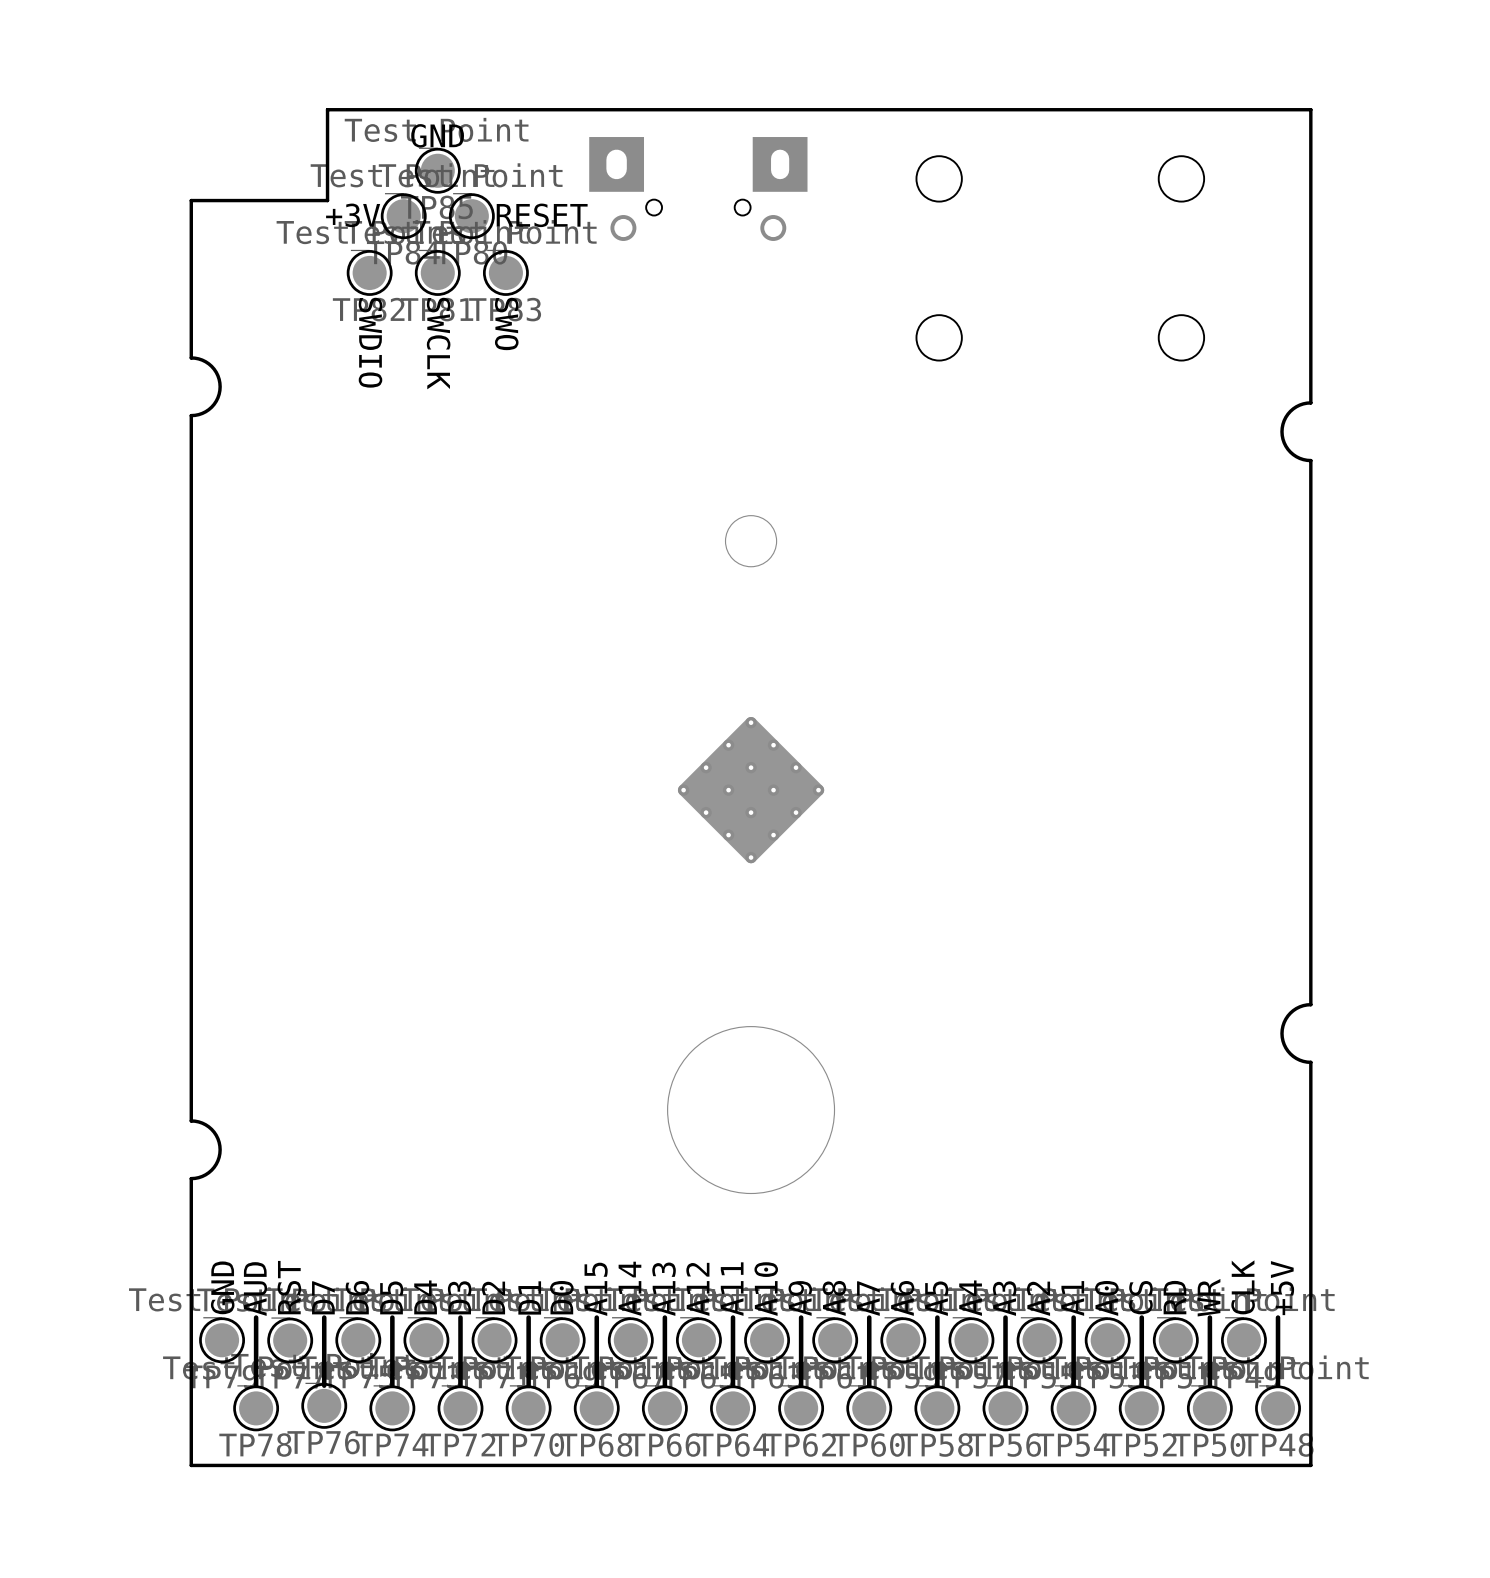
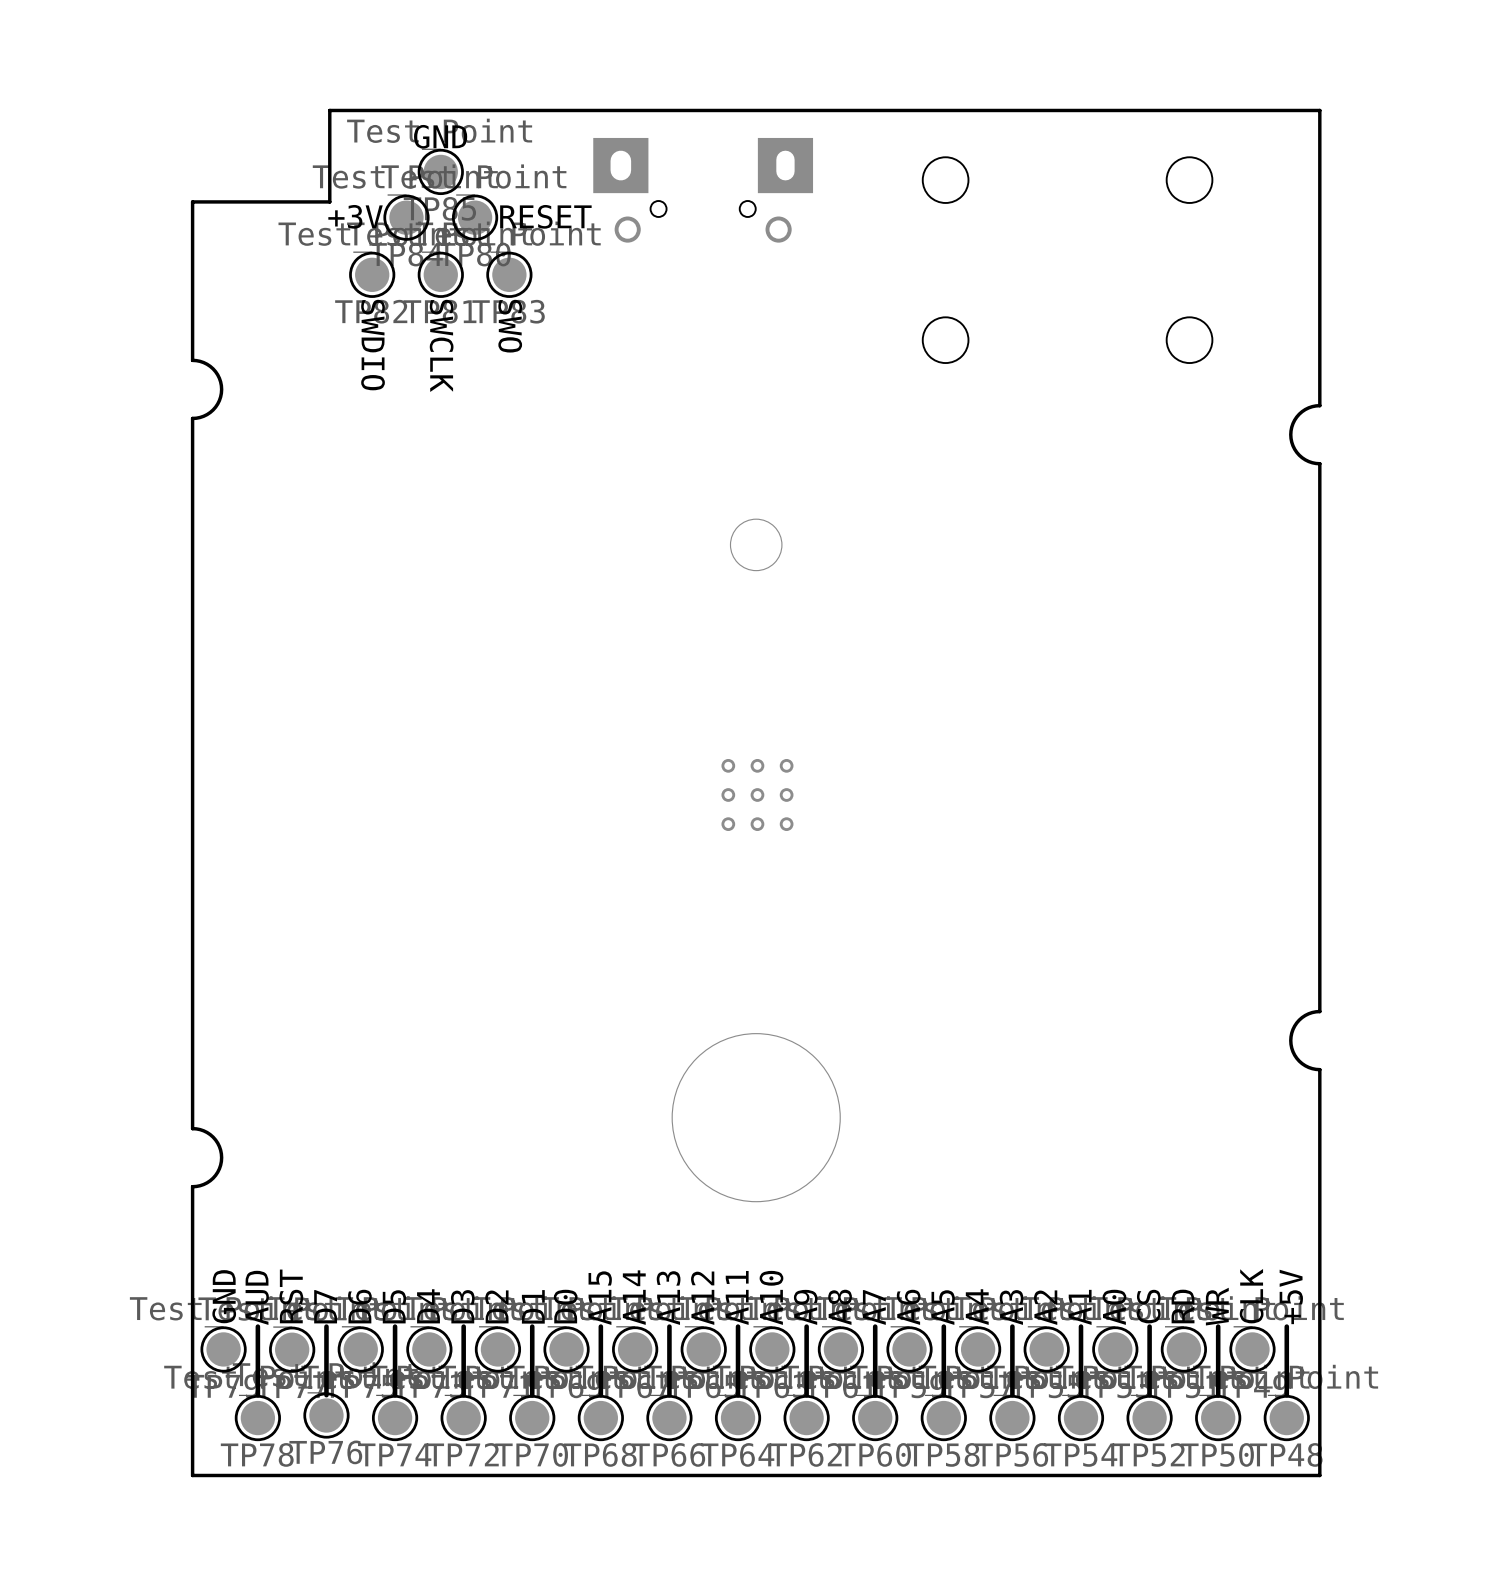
part footprint: [677, 717, 825, 864] -> [721, 758, 794, 832]

